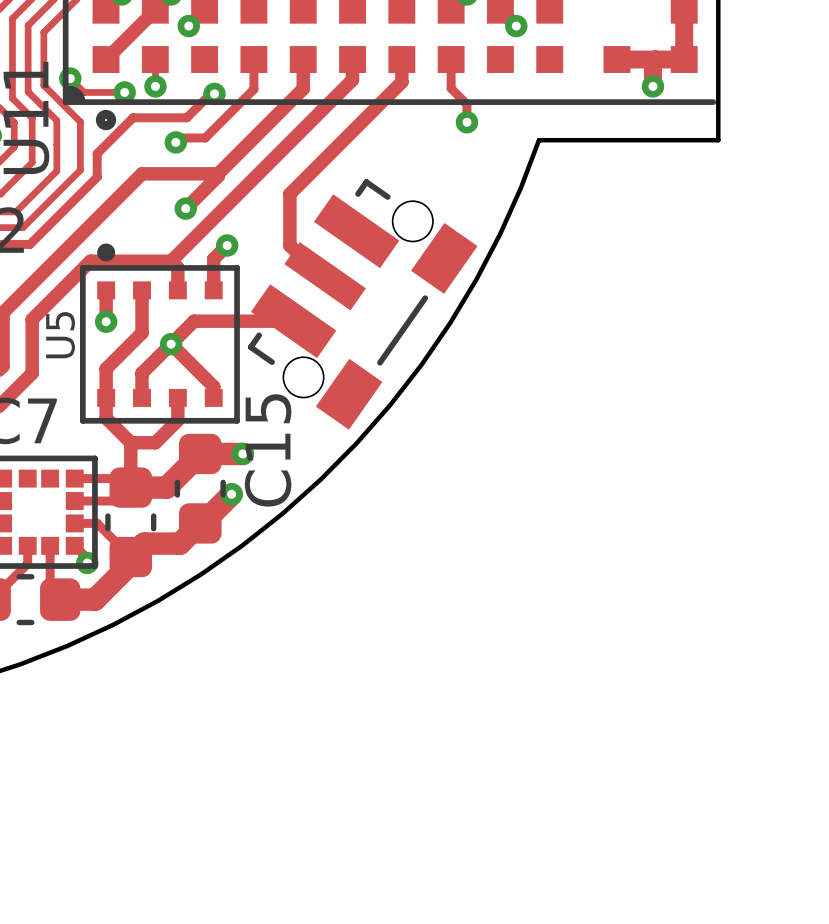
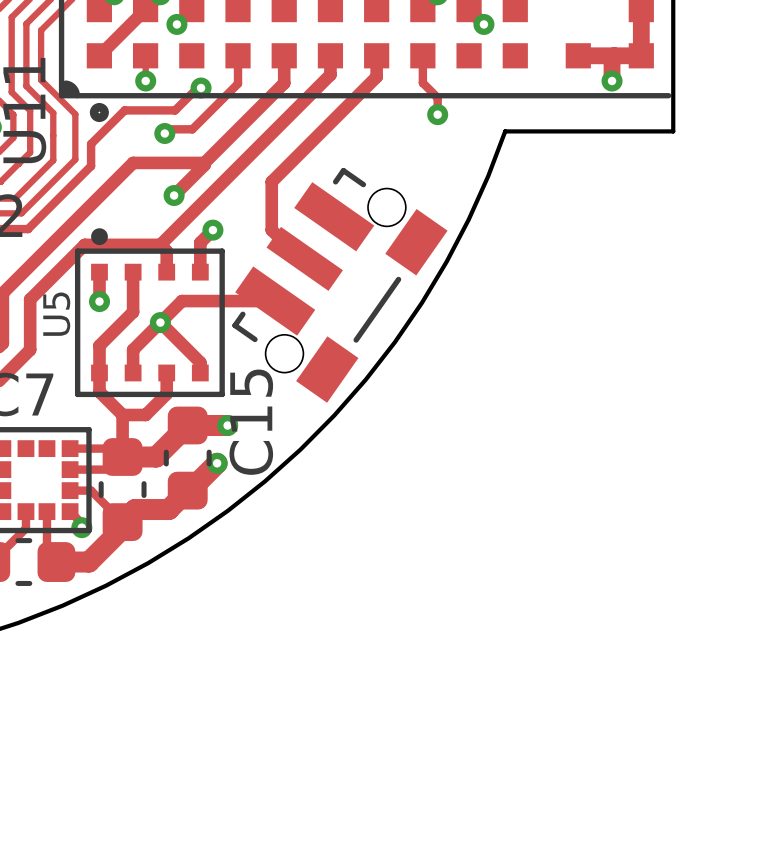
track: (70, 78) (84, 92) (124, 92) -> none
via: (70, 78) -> none
via: (124, 92) -> none

